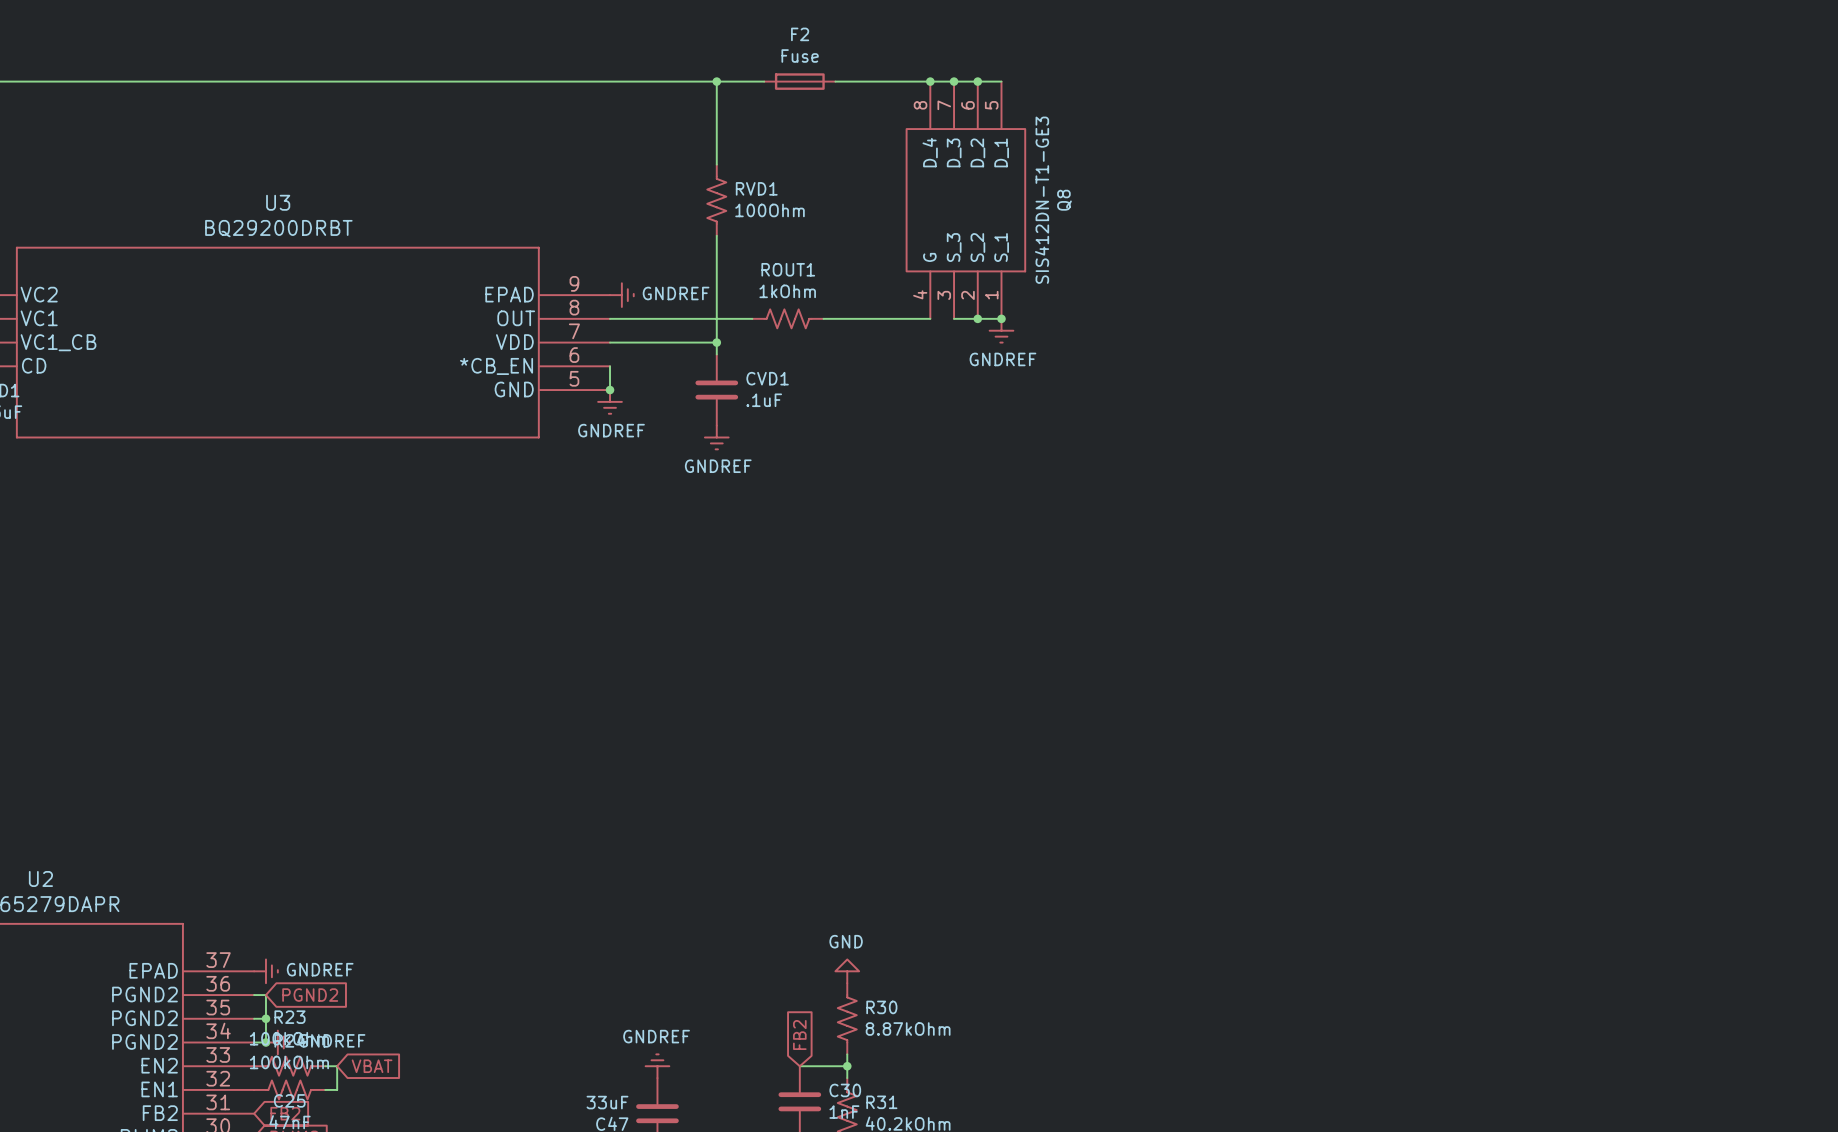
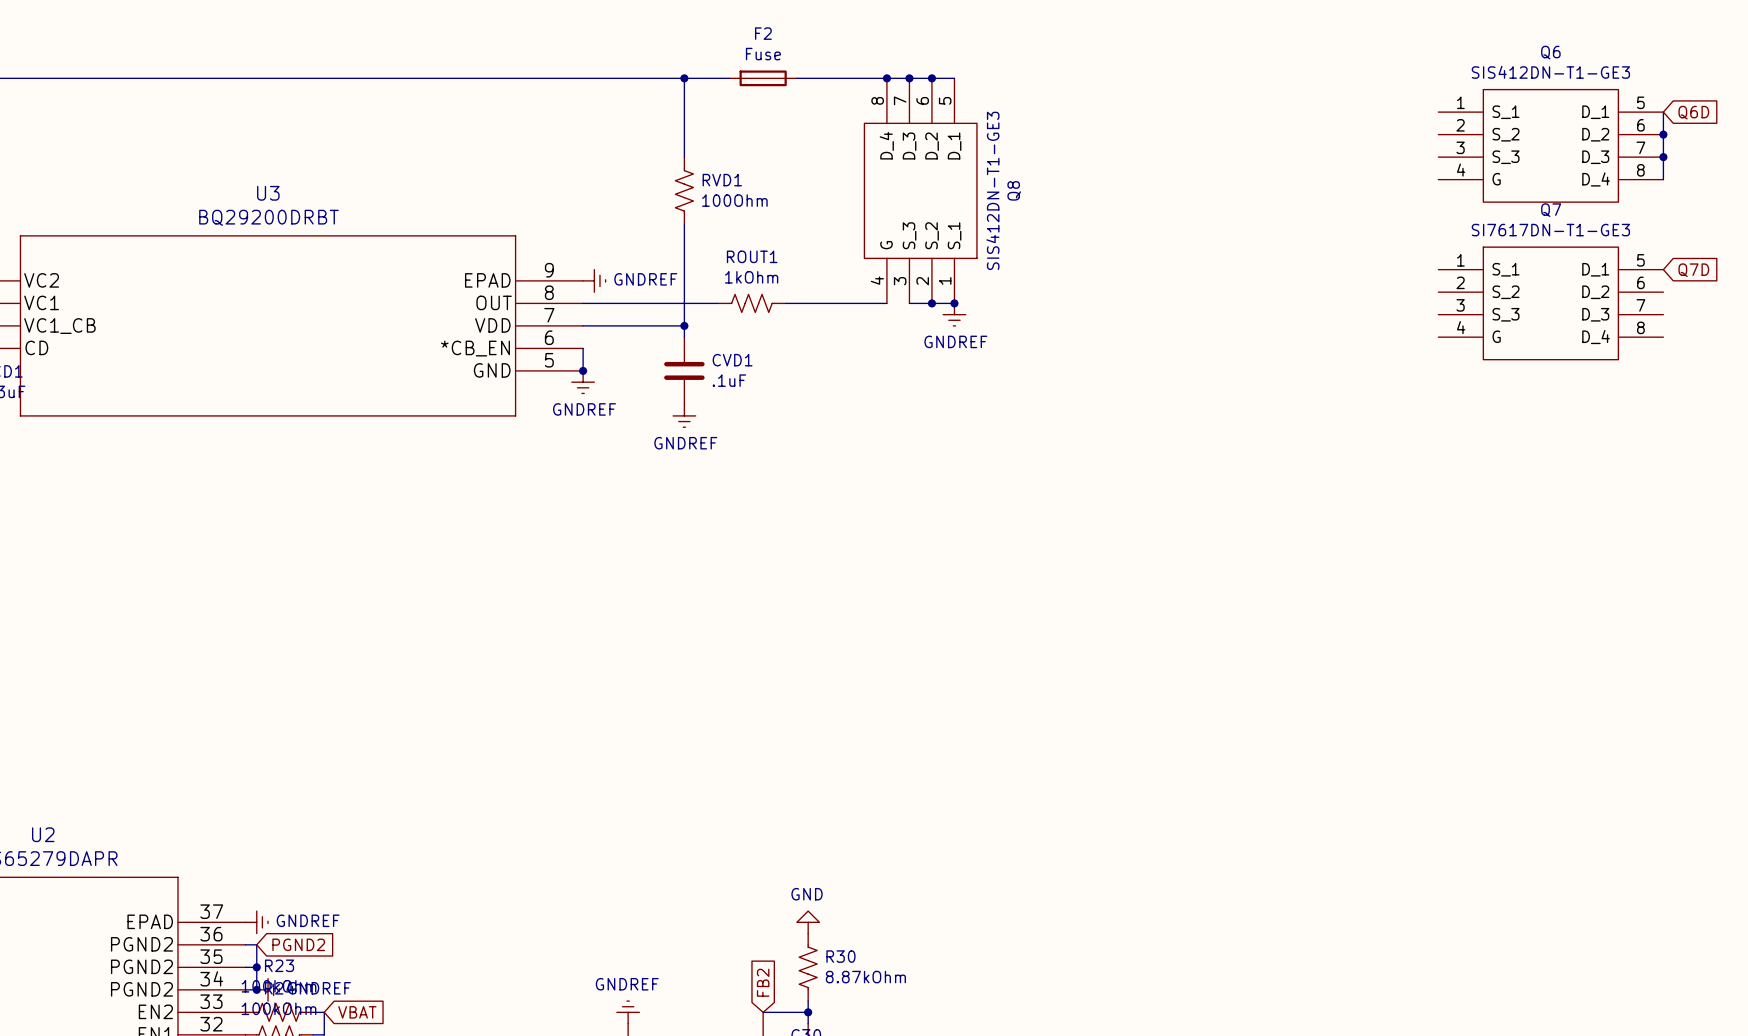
wire: none -> (1663, 112) (1663, 179)
global label: none -> Q6D (1693, 112)
junction: none -> (1663, 134)
Q6: none -> SIS412DN-T1-GE3 (1550, 145)
junction: none -> (1663, 157)
global label: none -> Q7D (1693, 270)
Q7: none -> SI7617DN-T1-GE3 (1550, 303)

